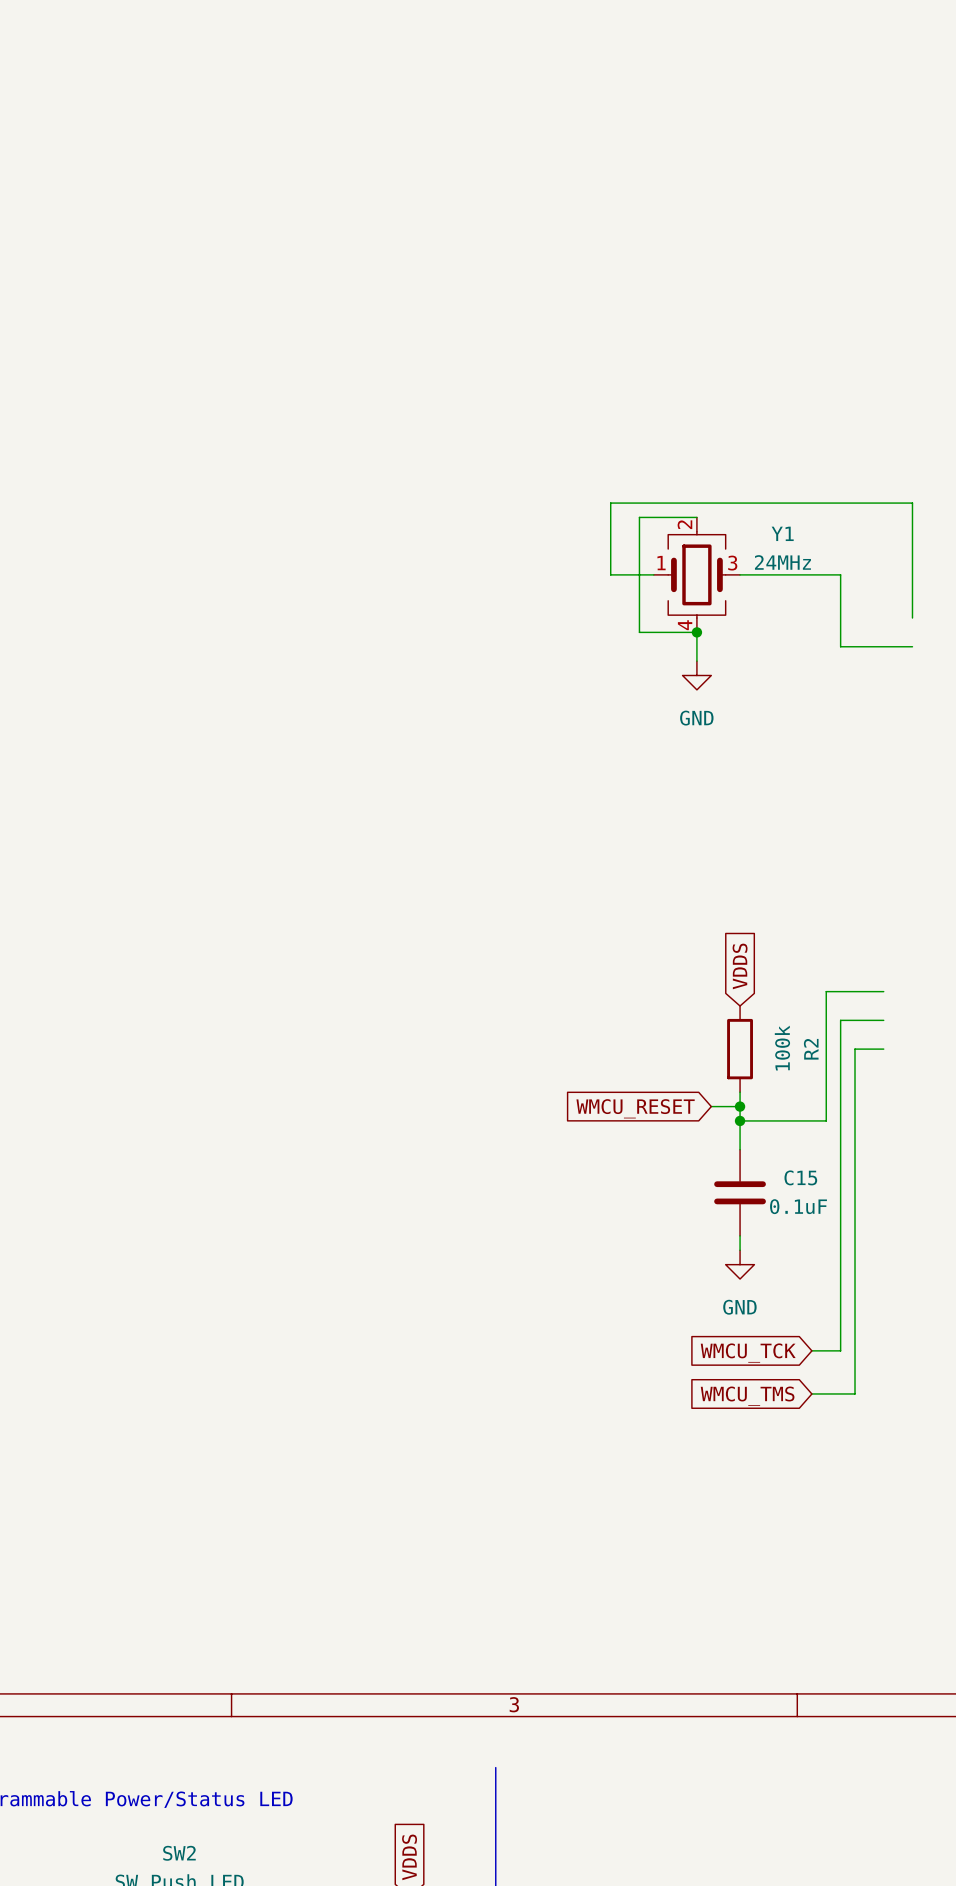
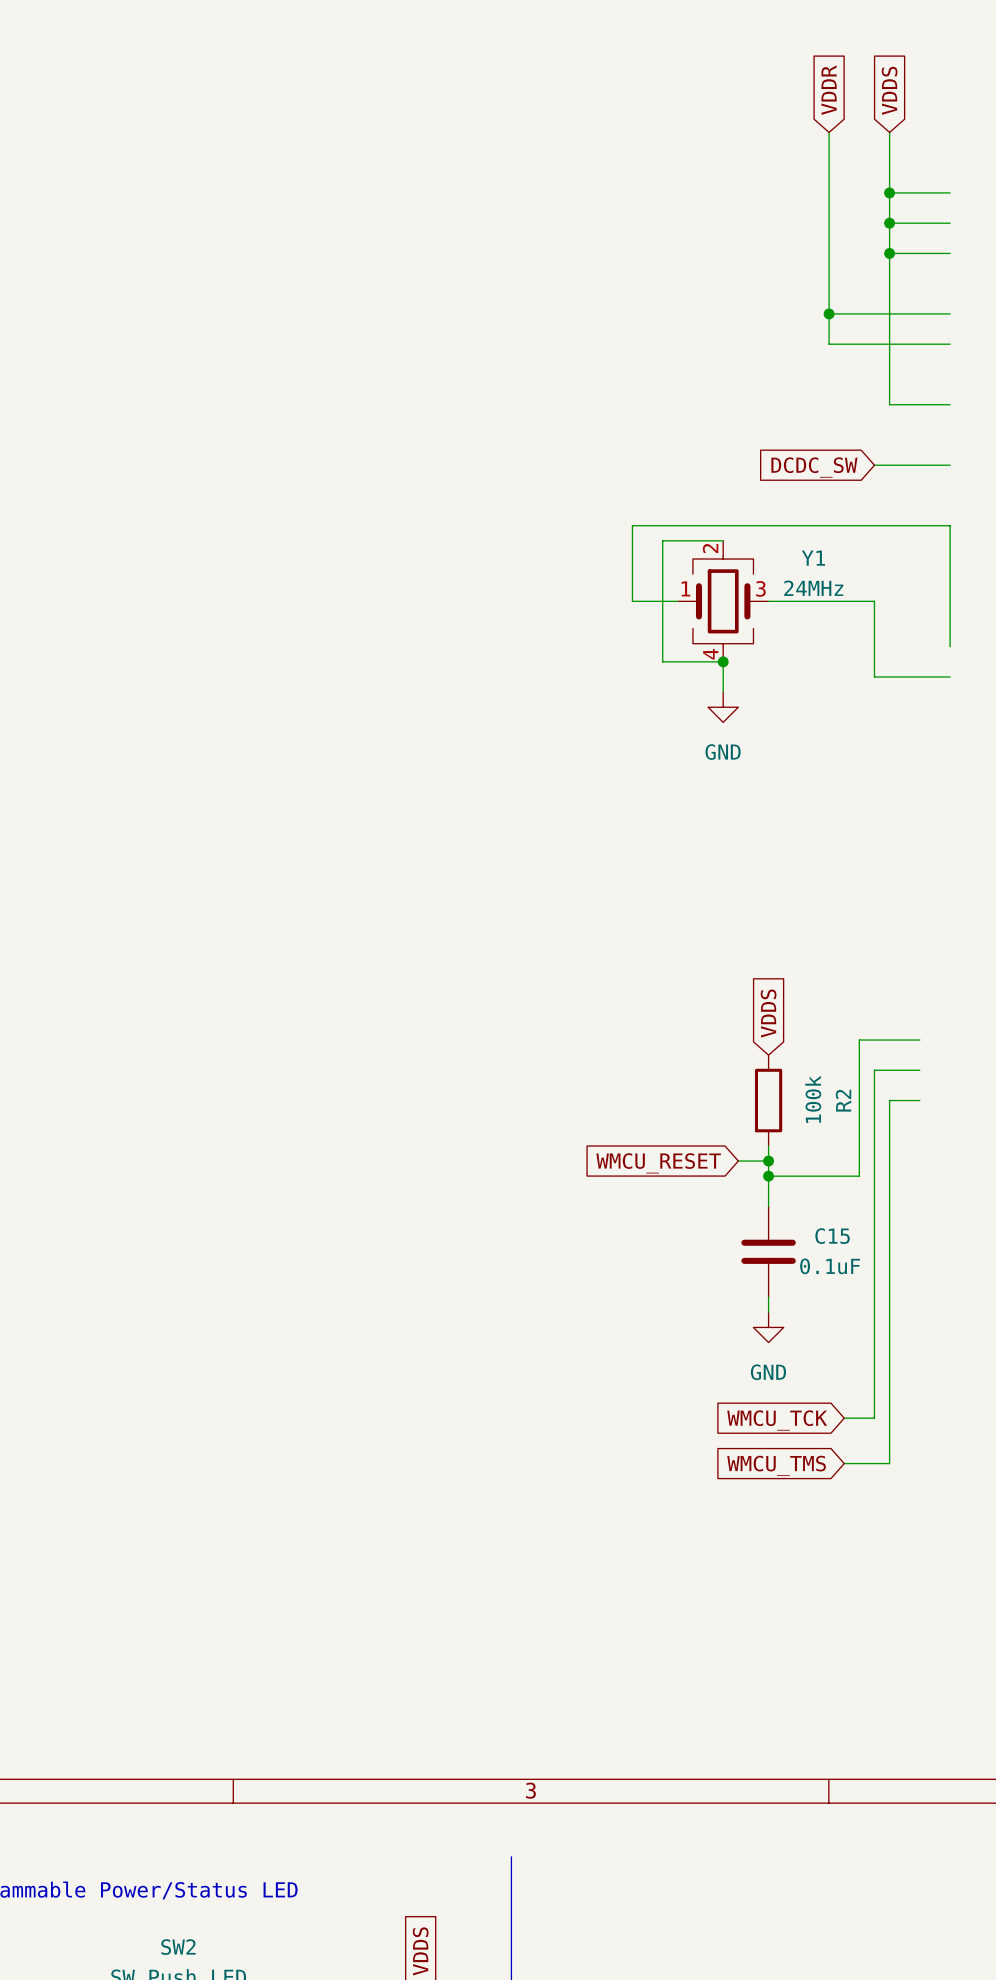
global label: none -> VDDR (829, 90)
global label: none -> VDDS (889, 90)
wire: none -> (829, 132) (829, 344) (950, 344)
wire: none -> (889, 132) (889, 404) (950, 404)
wire: none -> (889, 192) (950, 192)
junction: none -> (889, 192)
wire: none -> (889, 223) (950, 223)
junction: none -> (889, 223)
wire: none -> (889, 253) (950, 253)
junction: none -> (889, 253)
wire: none -> (829, 313) (950, 313)
junction: none -> (829, 313)
wire: none -> (874, 465) (950, 465)
global label: none -> DCDC_SW (814, 467)

